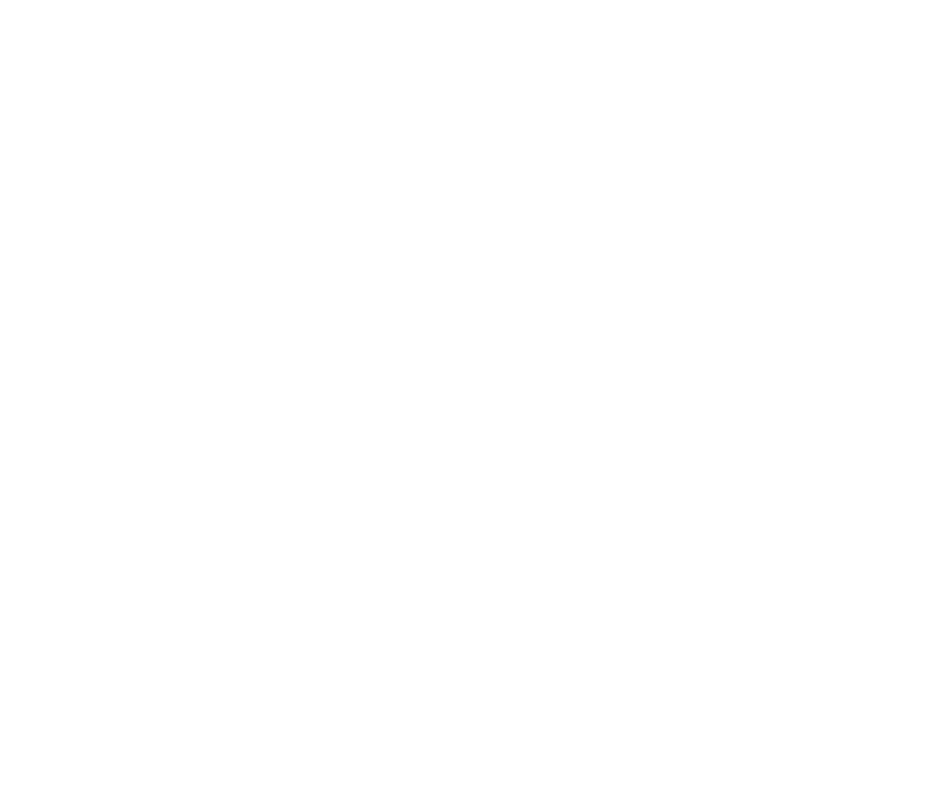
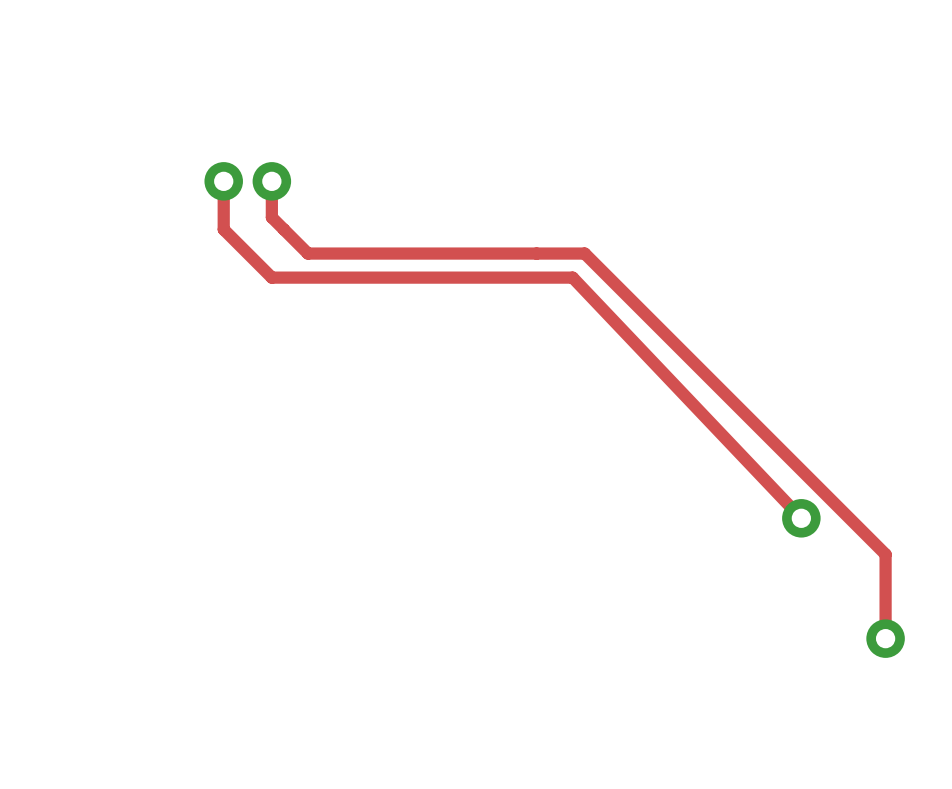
track: none -> (223, 181) (223, 229) (271, 277) (572, 277) (801, 518)
via: none -> (223, 181)
track: none -> (271, 181) (271, 217) (307, 253) (584, 253) (885, 554) (885, 638)
via: none -> (271, 181)
via: none -> (801, 518)
via: none -> (885, 638)

